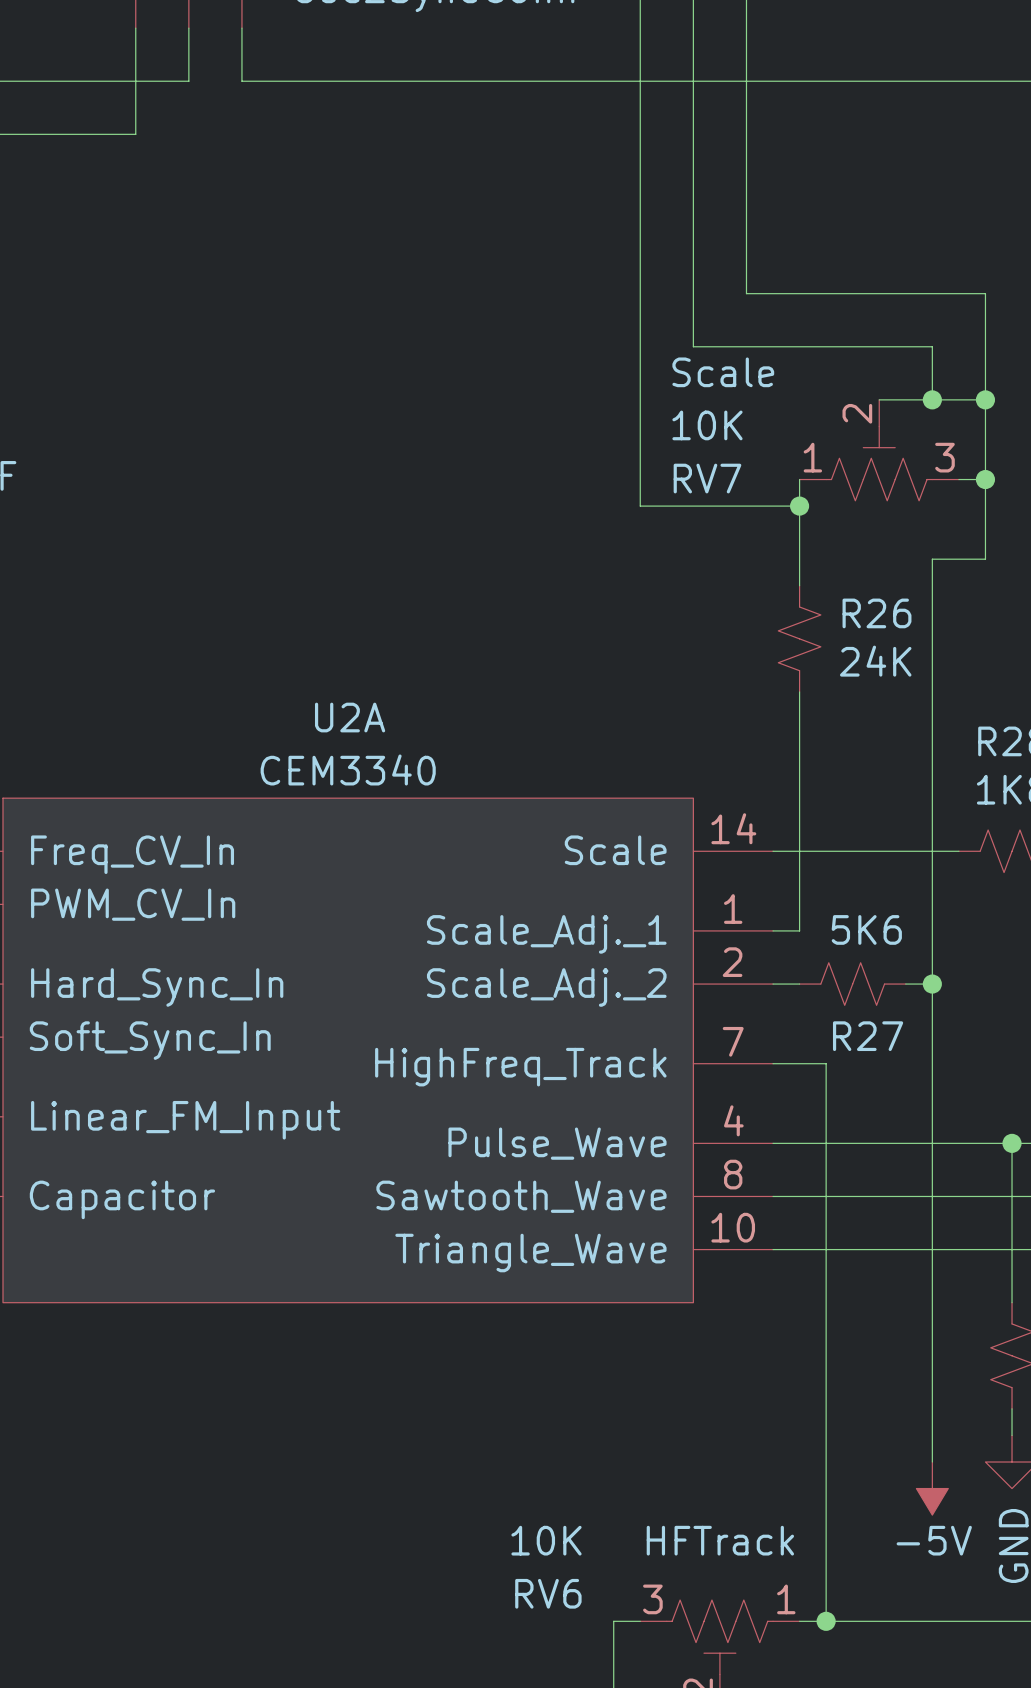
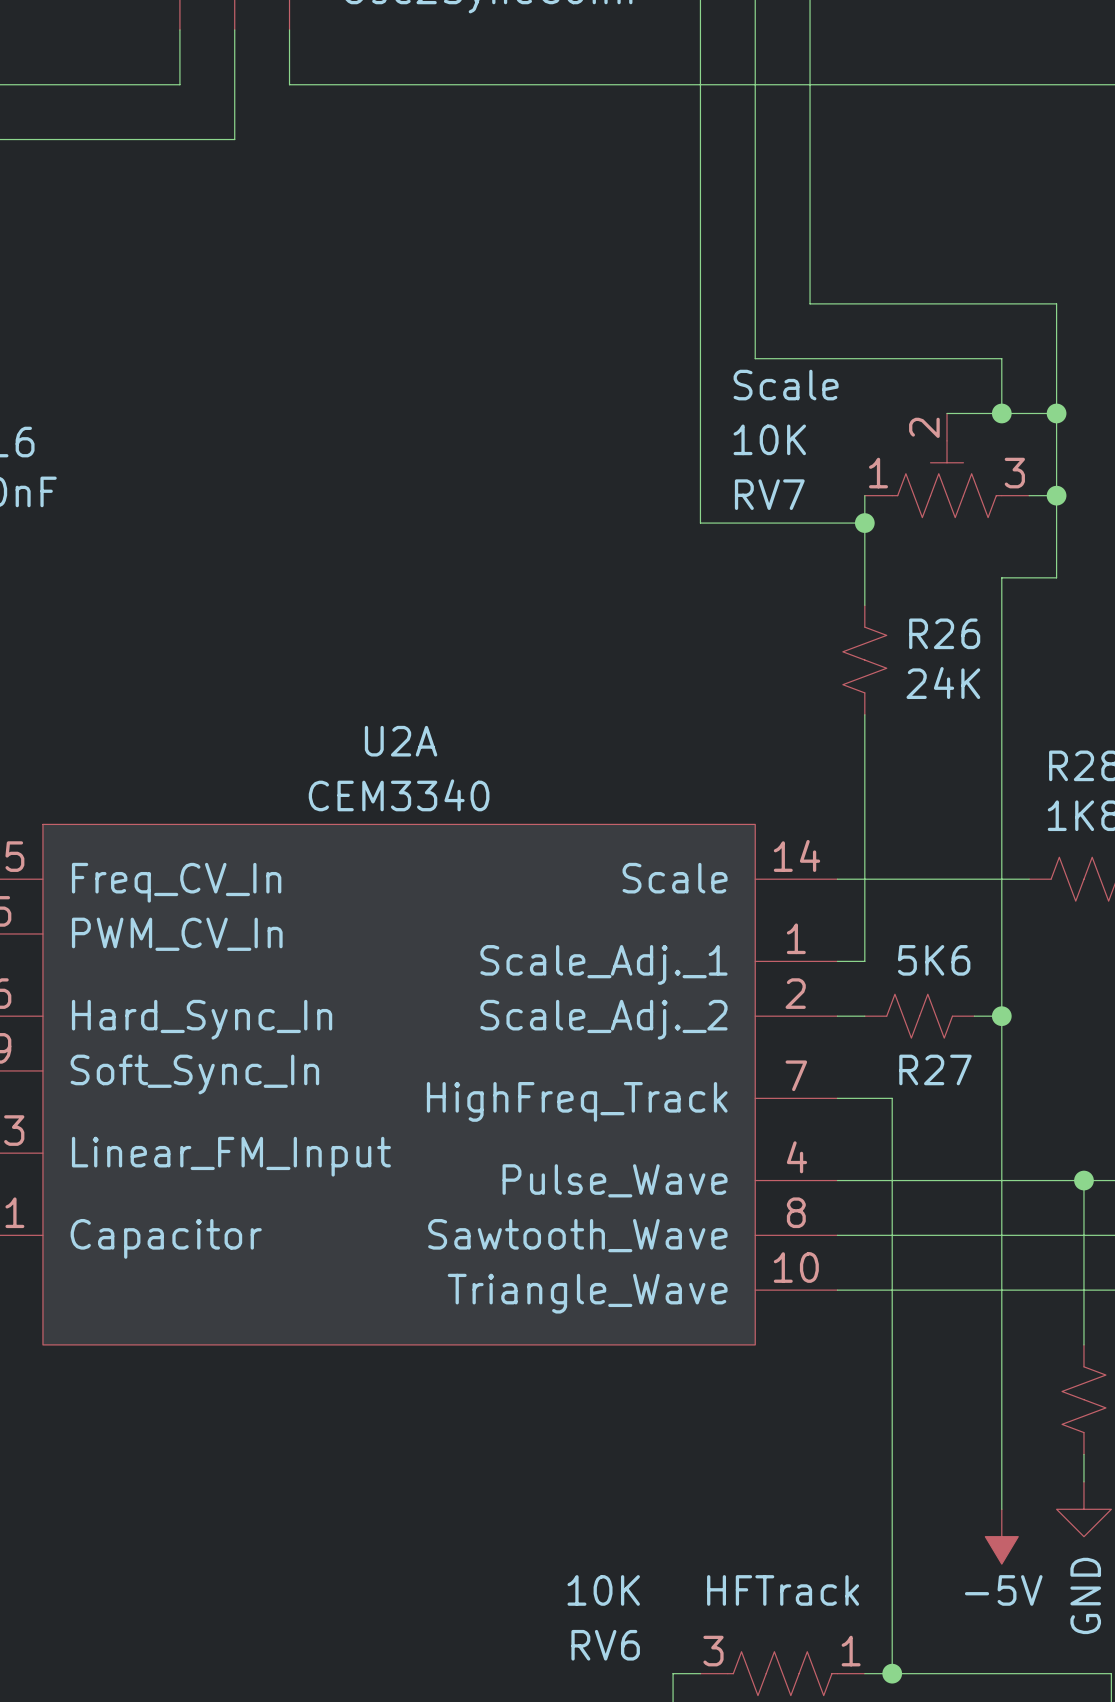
wire: (188, 81) (135, 81) (135, 134) -> (234, 84) (234, 139) (179, 139)

